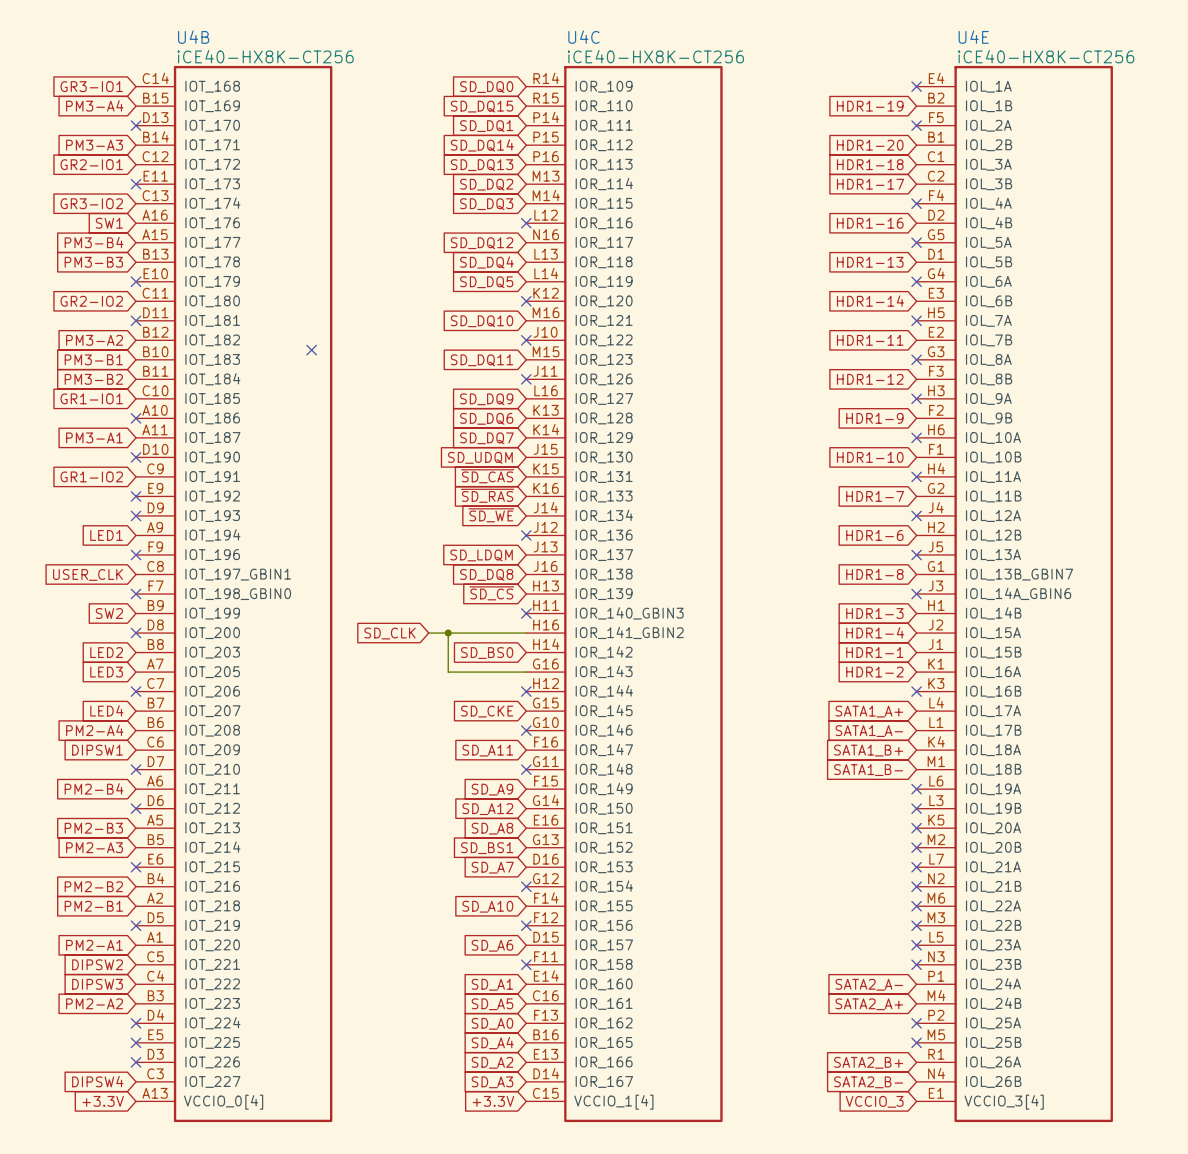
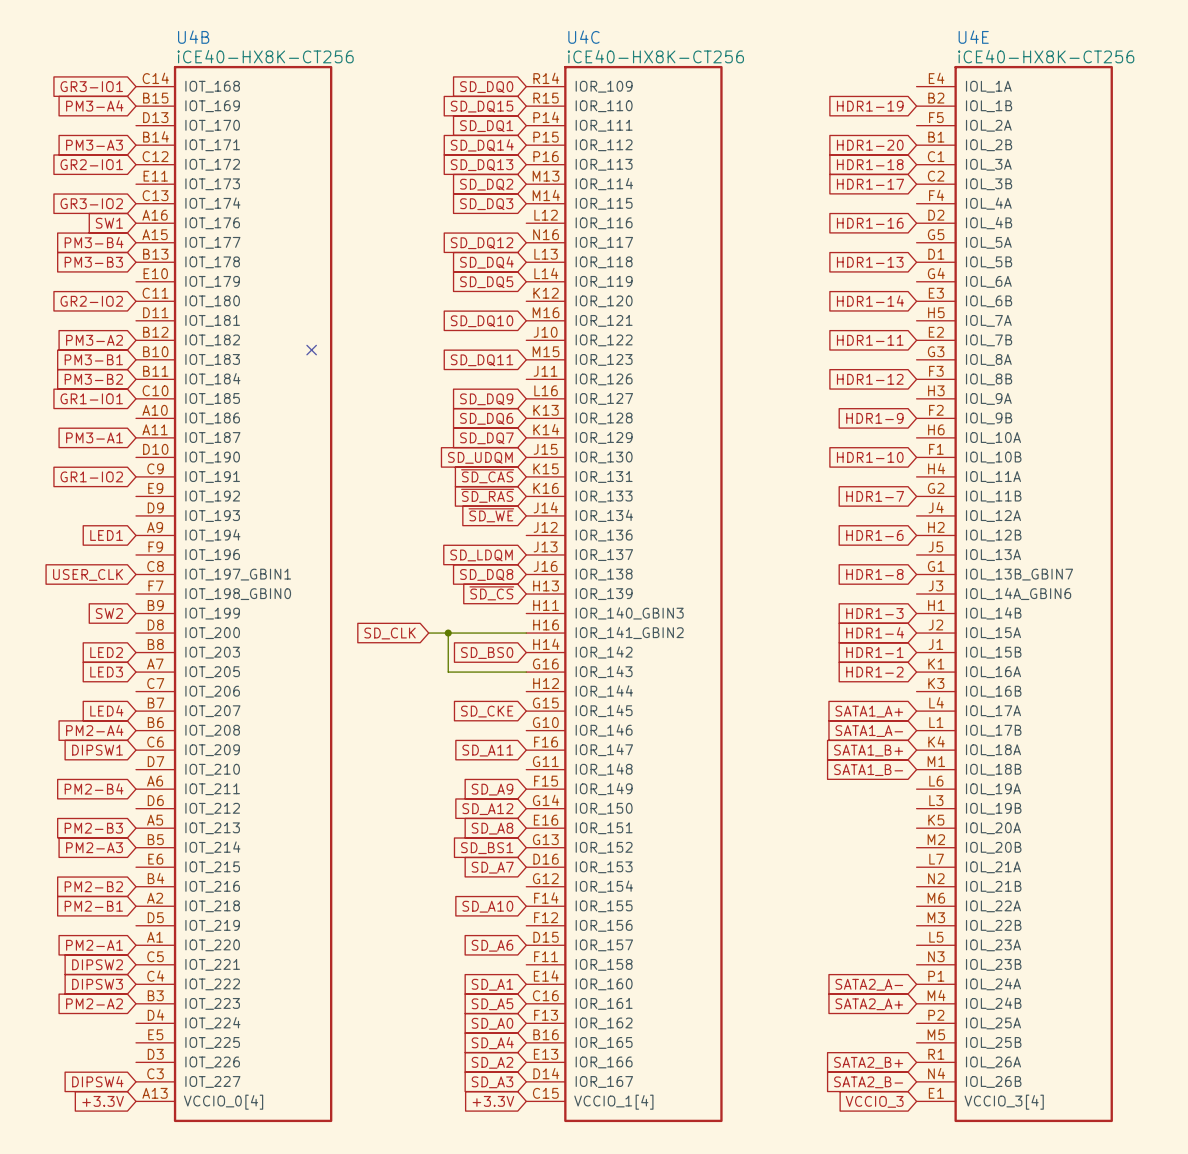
no-connect mark: (916, 86) -> none
no-connect mark: (136, 125) -> none
no-connect mark: (916, 125) -> none
no-connect mark: (136, 184) -> none
no-connect mark: (916, 203) -> none
no-connect mark: (526, 223) -> none
no-connect mark: (916, 242) -> none
no-connect mark: (136, 281) -> none
no-connect mark: (916, 281) -> none
no-connect mark: (526, 301) -> none
no-connect mark: (136, 320) -> none
no-connect mark: (916, 320) -> none
no-connect mark: (526, 340) -> none
no-connect mark: (916, 359) -> none
no-connect mark: (526, 379) -> none
no-connect mark: (916, 398) -> none
no-connect mark: (136, 418) -> none
no-connect mark: (916, 437) -> none
no-connect mark: (136, 457) -> none
no-connect mark: (916, 476) -> none
no-connect mark: (136, 496) -> none
no-connect mark: (136, 515) -> none
no-connect mark: (916, 515) -> none
no-connect mark: (526, 535) -> none
no-connect mark: (136, 554) -> none
no-connect mark: (916, 554) -> none
no-connect mark: (136, 594) -> none
no-connect mark: (916, 594) -> none
no-connect mark: (526, 613) -> none
no-connect mark: (136, 633) -> none
no-connect mark: (136, 691) -> none
no-connect mark: (526, 691) -> none
no-connect mark: (916, 691) -> none
no-connect mark: (526, 730) -> none
no-connect mark: (136, 769) -> none
no-connect mark: (526, 769) -> none
no-connect mark: (916, 789) -> none
no-connect mark: (136, 808) -> none
no-connect mark: (916, 808) -> none
no-connect mark: (916, 828) -> none
no-connect mark: (916, 847) -> none
no-connect mark: (136, 867) -> none
no-connect mark: (916, 867) -> none
no-connect mark: (526, 886) -> none
no-connect mark: (916, 886) -> none
no-connect mark: (916, 906) -> none
no-connect mark: (136, 925) -> none
no-connect mark: (526, 925) -> none
no-connect mark: (916, 925) -> none
no-connect mark: (916, 945) -> none
no-connect mark: (526, 964) -> none
no-connect mark: (916, 964) -> none
no-connect mark: (136, 1023) -> none
no-connect mark: (916, 1023) -> none
no-connect mark: (136, 1042) -> none
no-connect mark: (916, 1042) -> none
no-connect mark: (136, 1062) -> none

